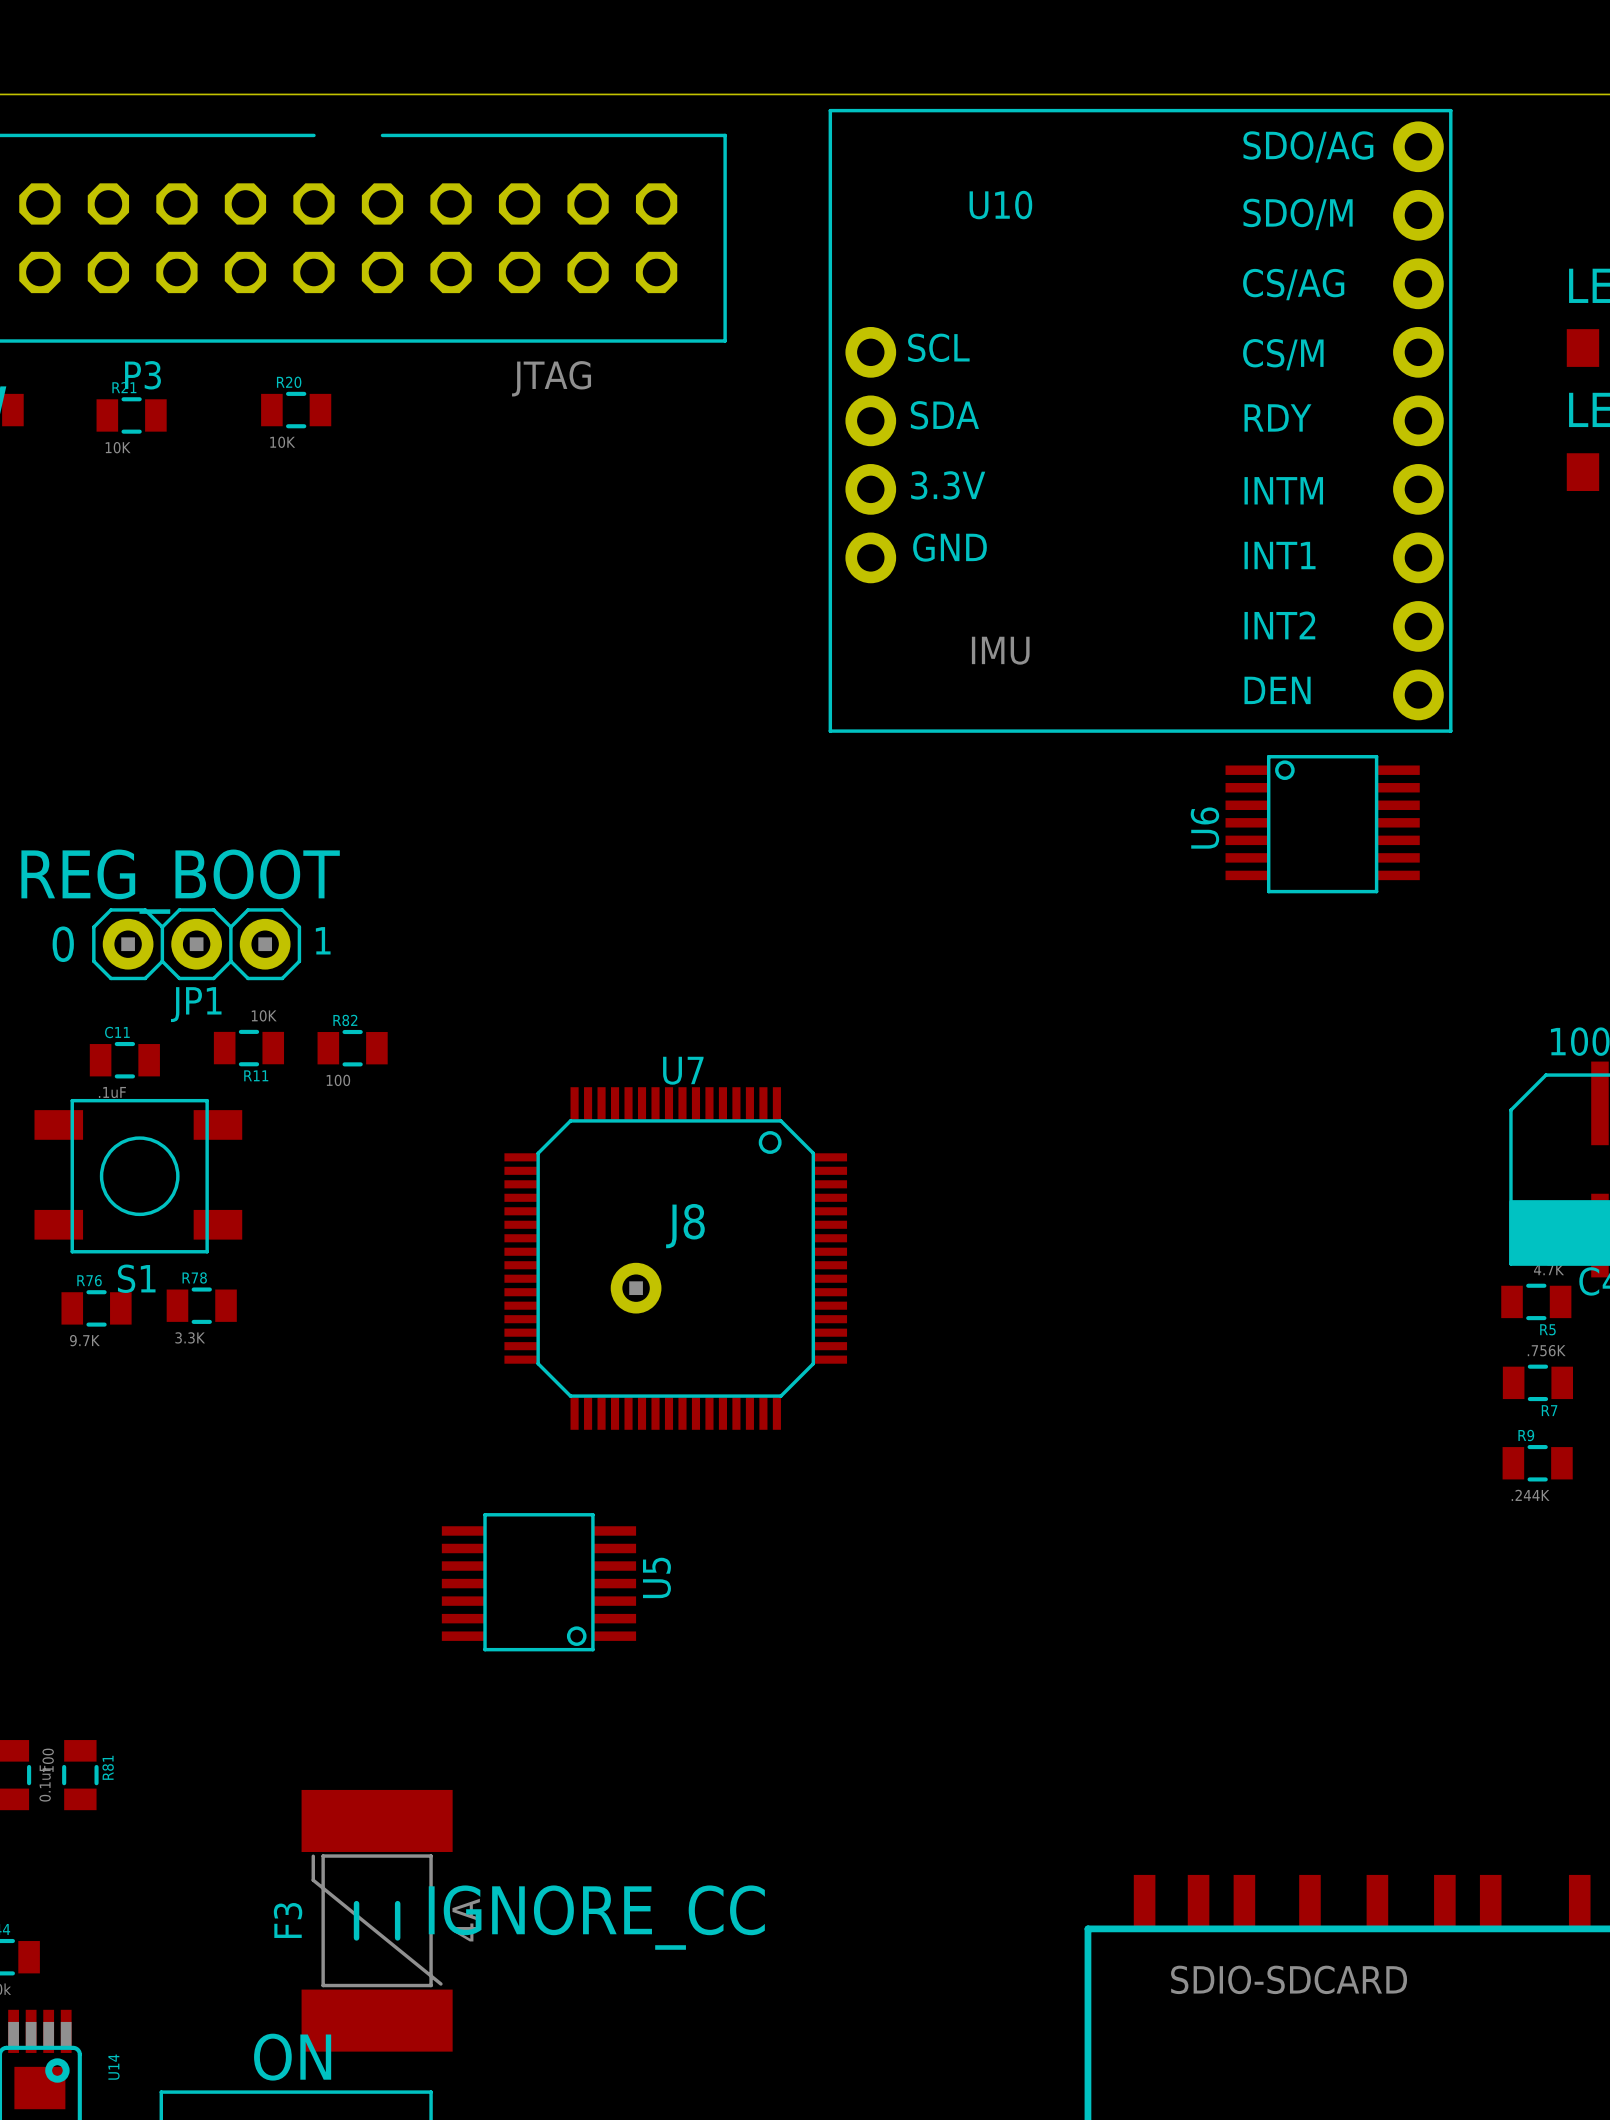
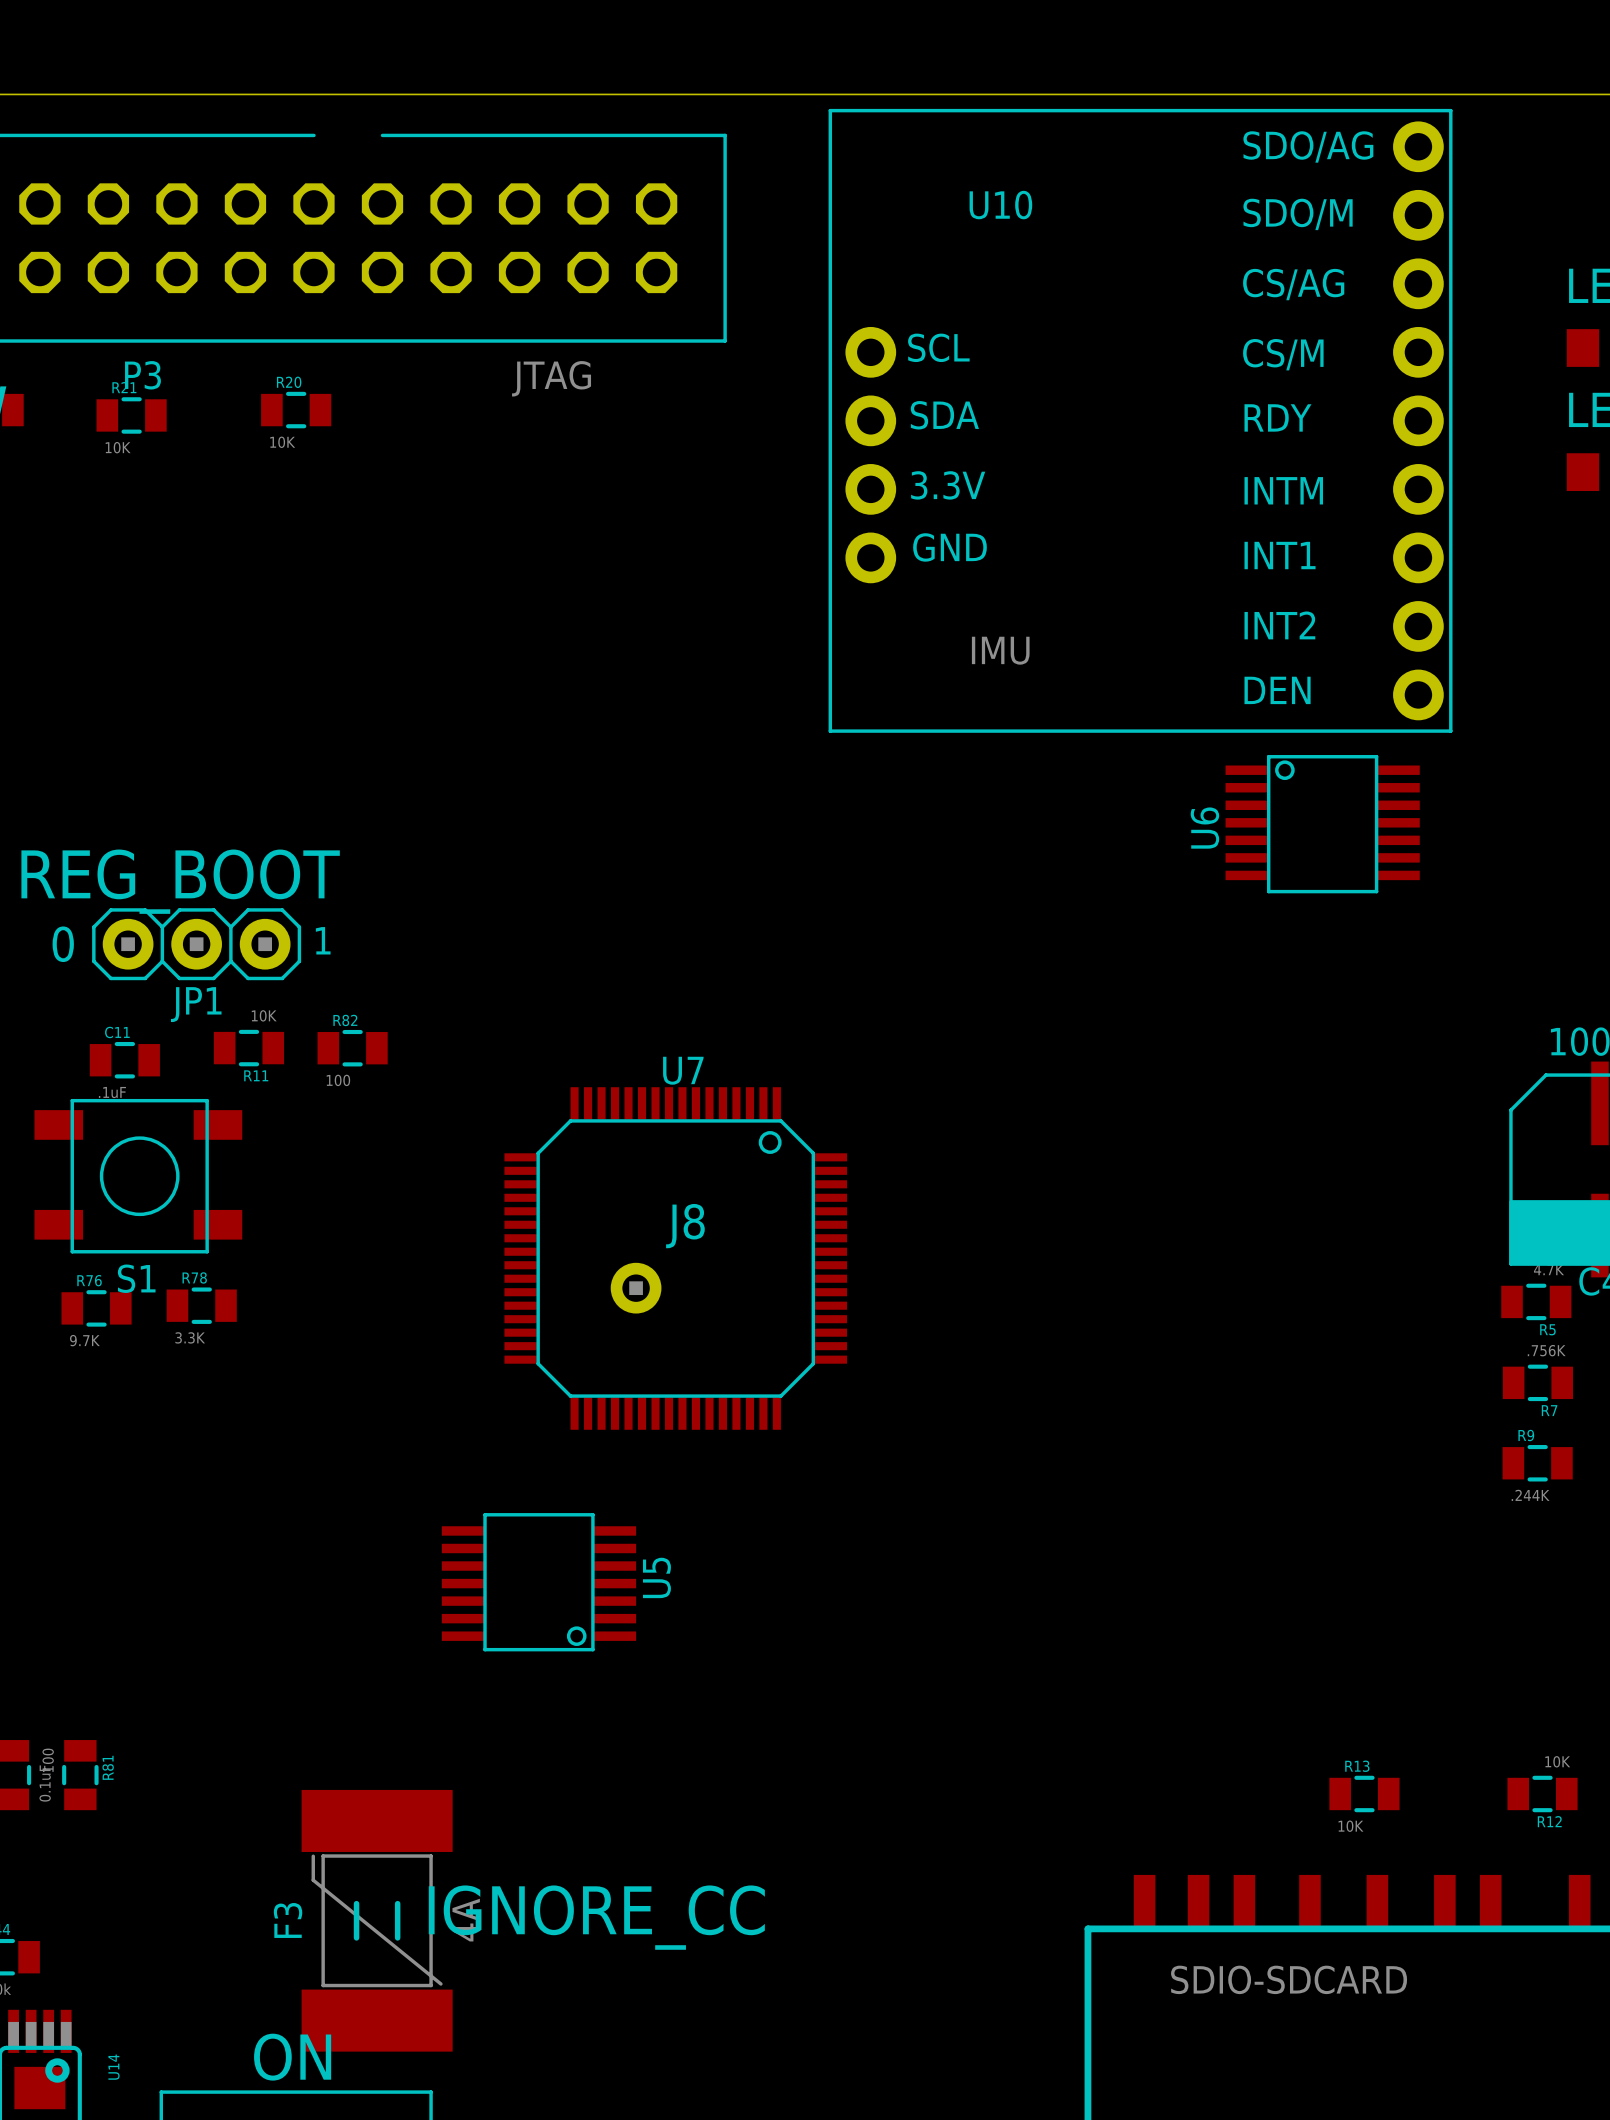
R13: none -> 10K (1364, 1793)
R12: none -> 10K (1542, 1793)

